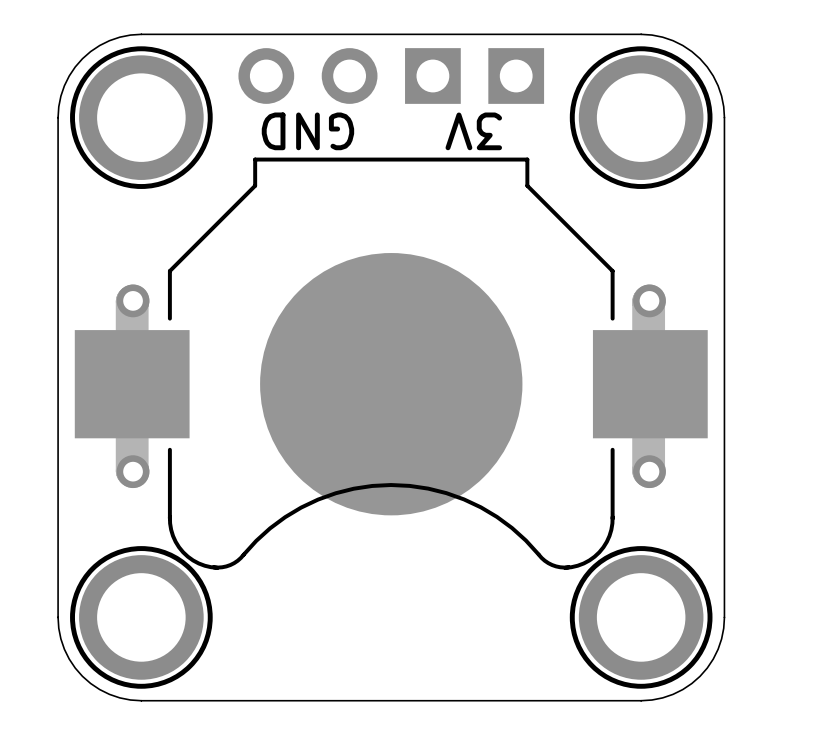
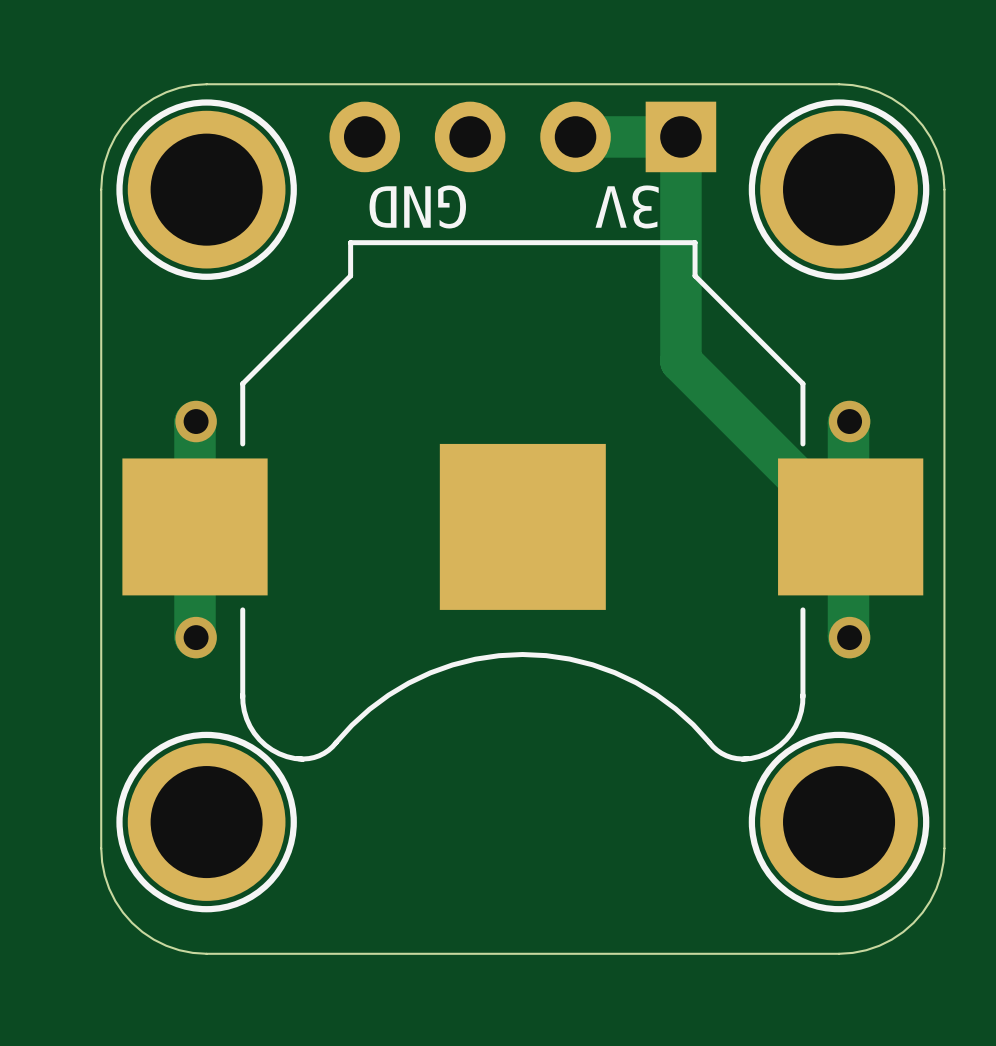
part footprint: [238, 48, 545, 104] -> [329, 101, 717, 173]
track: none -> (575, 136) (680, 136) (680, 361) (846, 526)
part footprint: [74, 157, 708, 570] -> [122, 240, 924, 762]
board edge: (58, 617) (64, 649) (82, 676) (109, 694) (141, 700) (652, 700) (682, 689) (707, 668) (721, 638) (724, 617) -> (101, 822) (102, 862) (104, 875) (109, 888) (123, 912) (142, 932) (153, 939) (179, 950) (206, 953) (852, 952) (879, 945) (891, 939) (903, 932) (922, 912) (930, 901) (940, 875) (943, 862) (944, 822)

